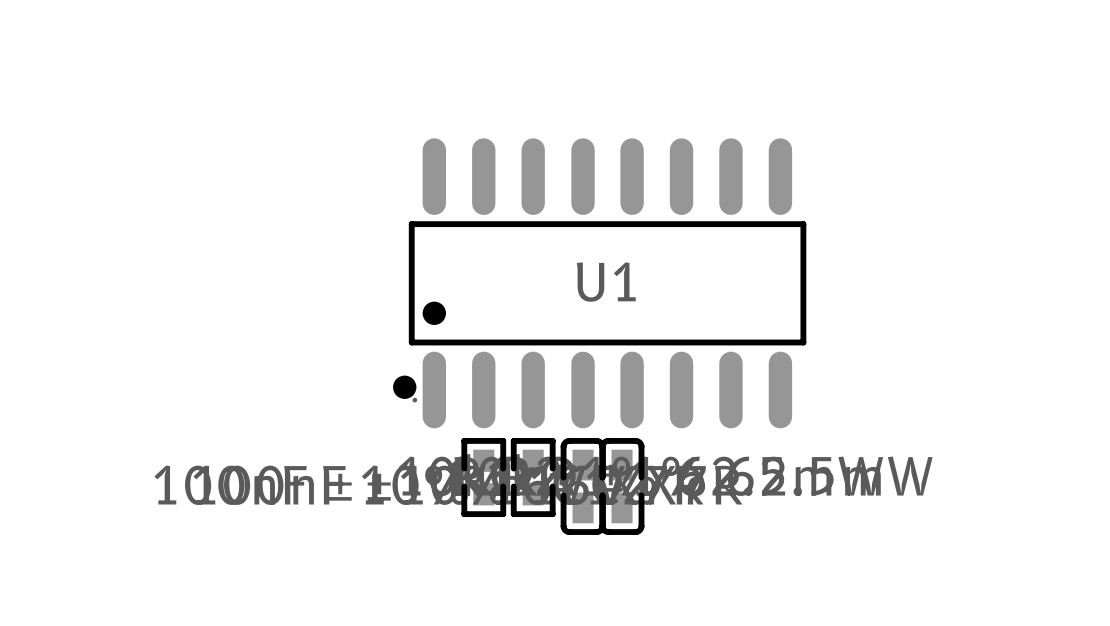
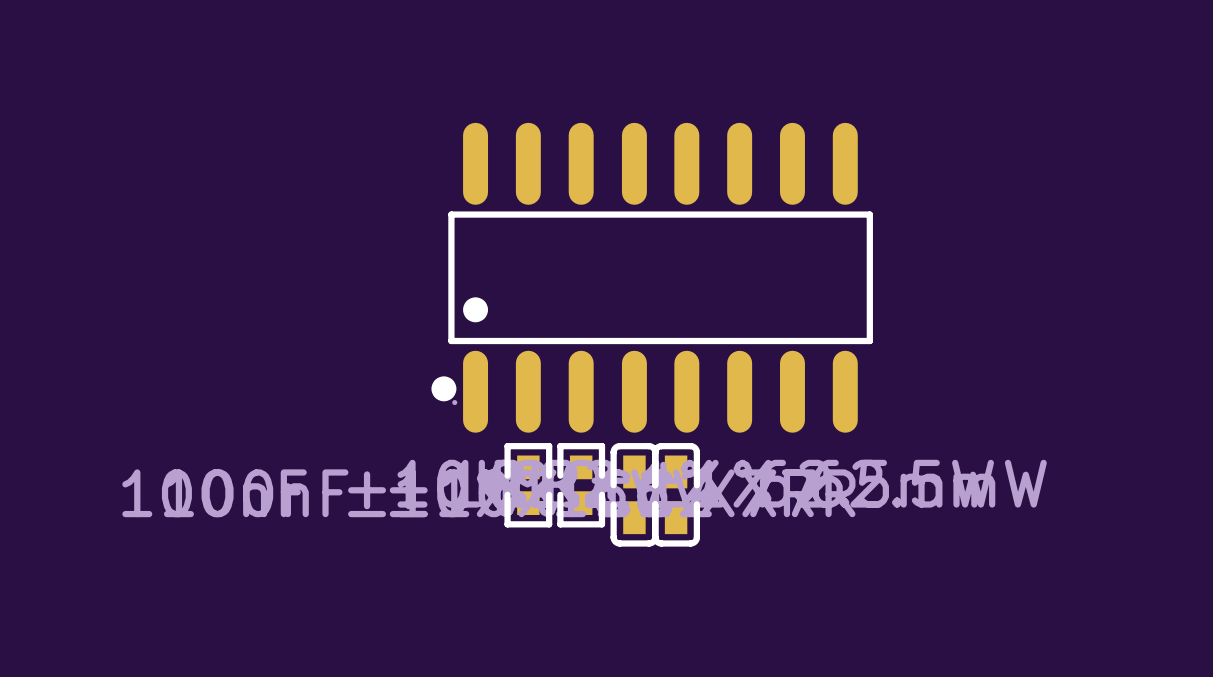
U1 name: U1 (606, 282) -> none

